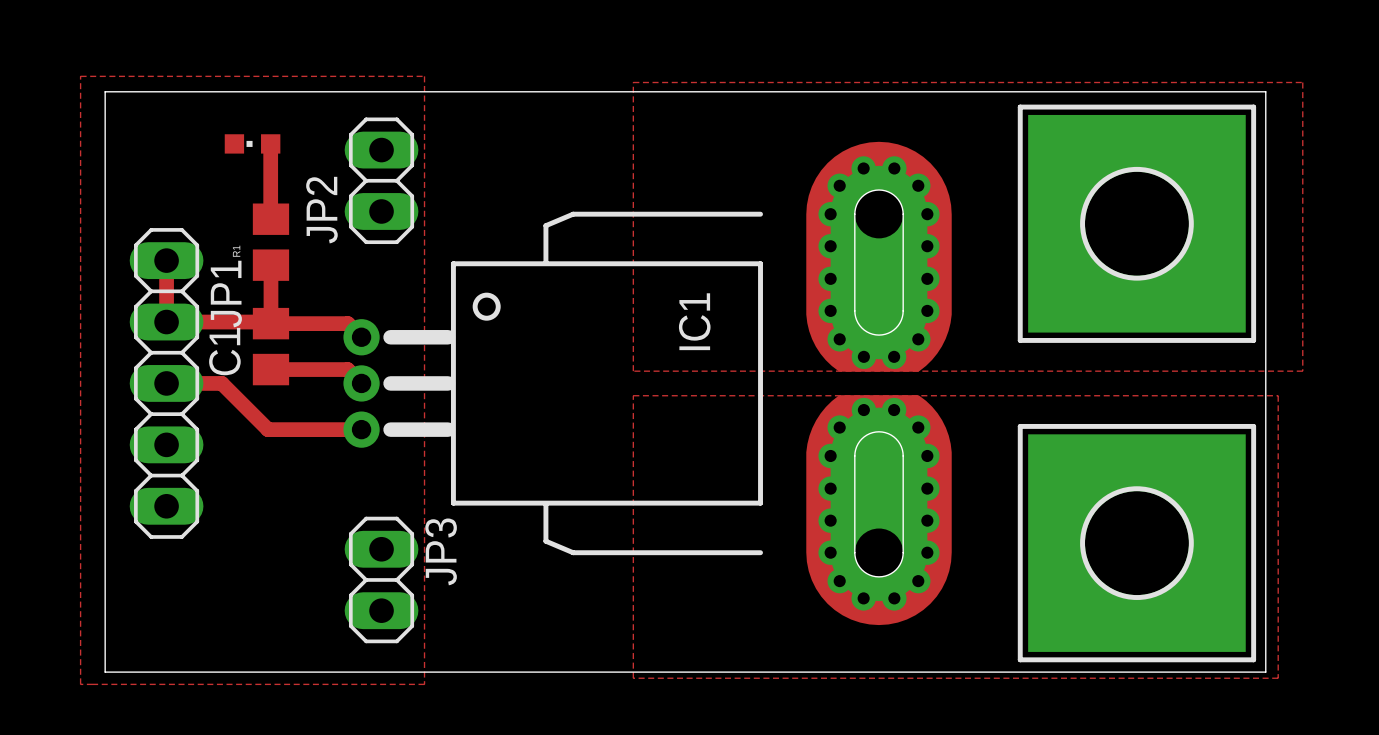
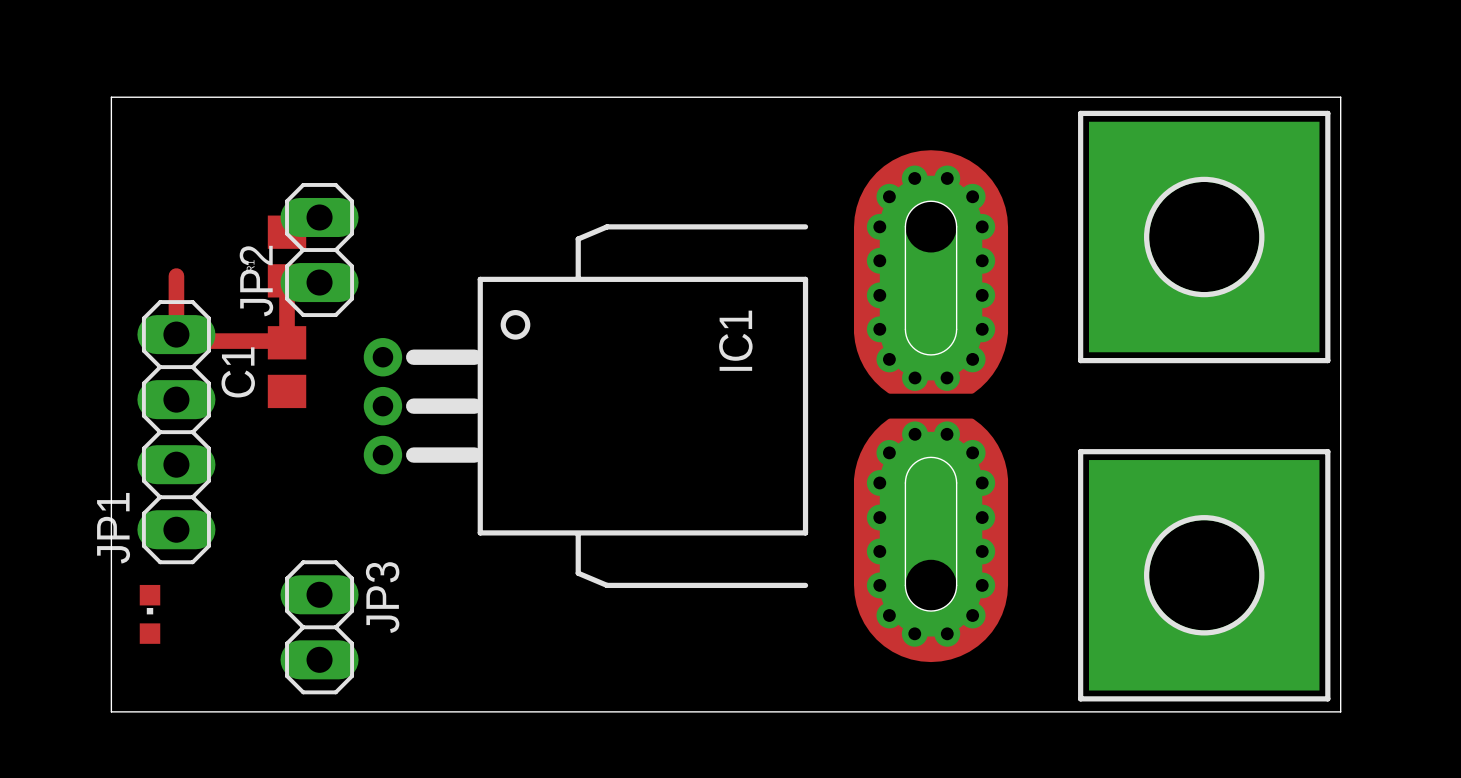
zone outline: (80, 76) (424, 76) (424, 684) (80, 684) (80, 76) -> none
zone outline: (633, 82) (633, 371) (1302, 371) (1302, 82) (633, 82) -> none
part rotation: 0° (252, 143) -> 90° clockwise (150, 614)
part position: (252, 143) -> (150, 614)
track: (270, 143) (270, 218) -> none
JP2 position: (381, 180) -> (319, 250)
JP1 footprint: [129, 228, 204, 539] -> [137, 300, 216, 565]
JP1 name position: JP1 (226, 294) -> JP1 (113, 528)
track: (270, 323) (347, 323) (361, 337) -> none
track: (270, 369) (347, 369) (361, 383) -> none
track: (166, 383) (221, 383) (268, 429) (361, 429) -> none
zone outline: (633, 395) (1278, 395) (1278, 678) (633, 678) (633, 395) -> none
JP3 position: (381, 579) -> (319, 627)

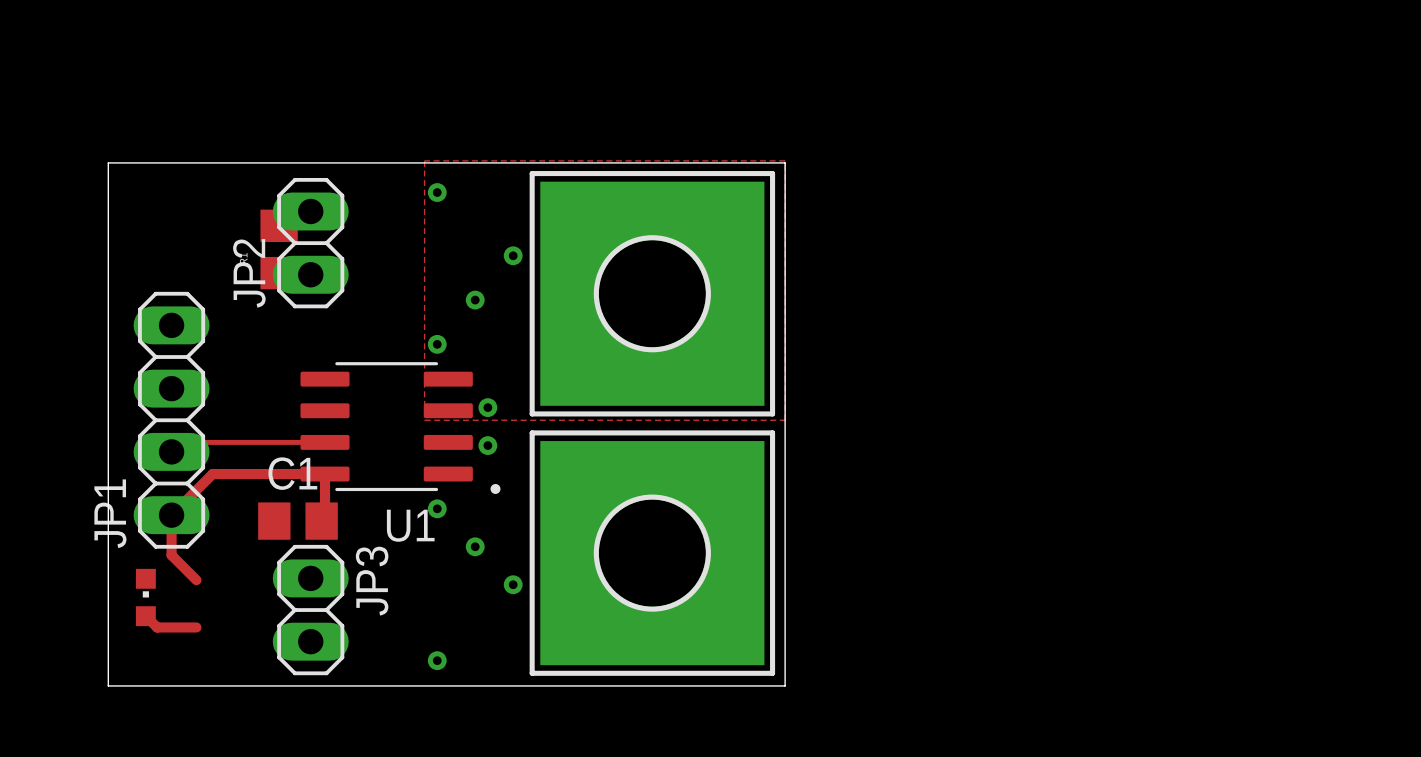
zone outline: none -> (424, 160) (424, 420) (785, 420) (785, 160) (424, 160)
board edge: (111, 167) (111, 97) (1340, 97) (1340, 711) (111, 711) (111, 705) -> (108, 162) (785, 162) (785, 685) (108, 685)
via: none -> (437, 192)
part: (1204, 237) -> none
via: none -> (513, 255)
track: (176, 276) (176, 341) (285, 341) (287, 342) (287, 280) -> none
part: none -> (652, 293)
via: none -> (475, 300)
via: none -> (437, 344)
C1 rotation: 0° (287, 367) -> 90° clockwise (298, 521)
C1 position: (287, 367) -> (298, 521)
IC1: (685, 406) -> none
via: none -> (487, 407)
U1: none -> (400, 428)
track: none -> (325, 442) (181, 442) (171, 451)
via: none -> (487, 445)
via: none -> (437, 508)
track: none -> (321, 521) (325, 517) (325, 474) (212, 474) (171, 515) (171, 555) (196, 580)
via: none -> (475, 546)
part: none -> (652, 553)
part: (1204, 575) -> none
via: none -> (513, 584)
track: none -> (145, 616) (157, 627) (196, 627)
via: none -> (437, 660)

